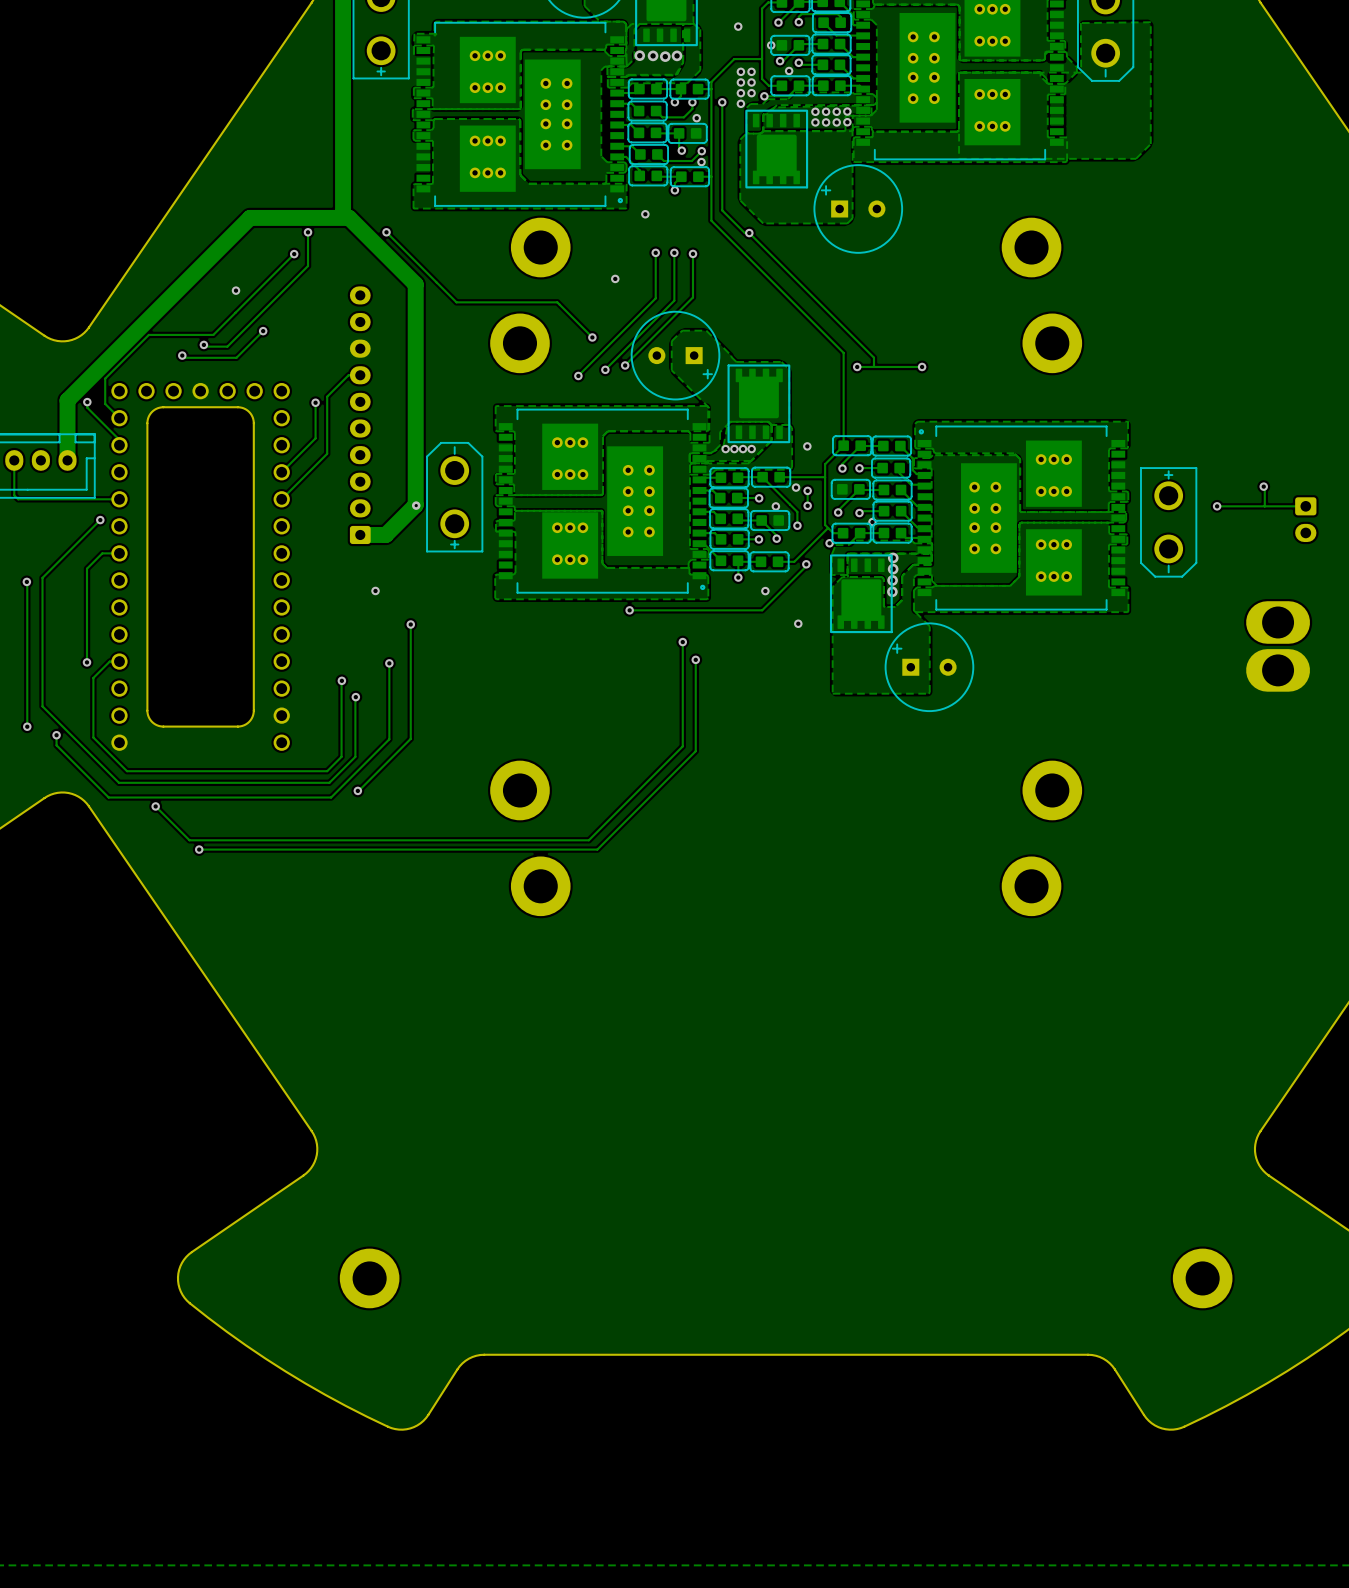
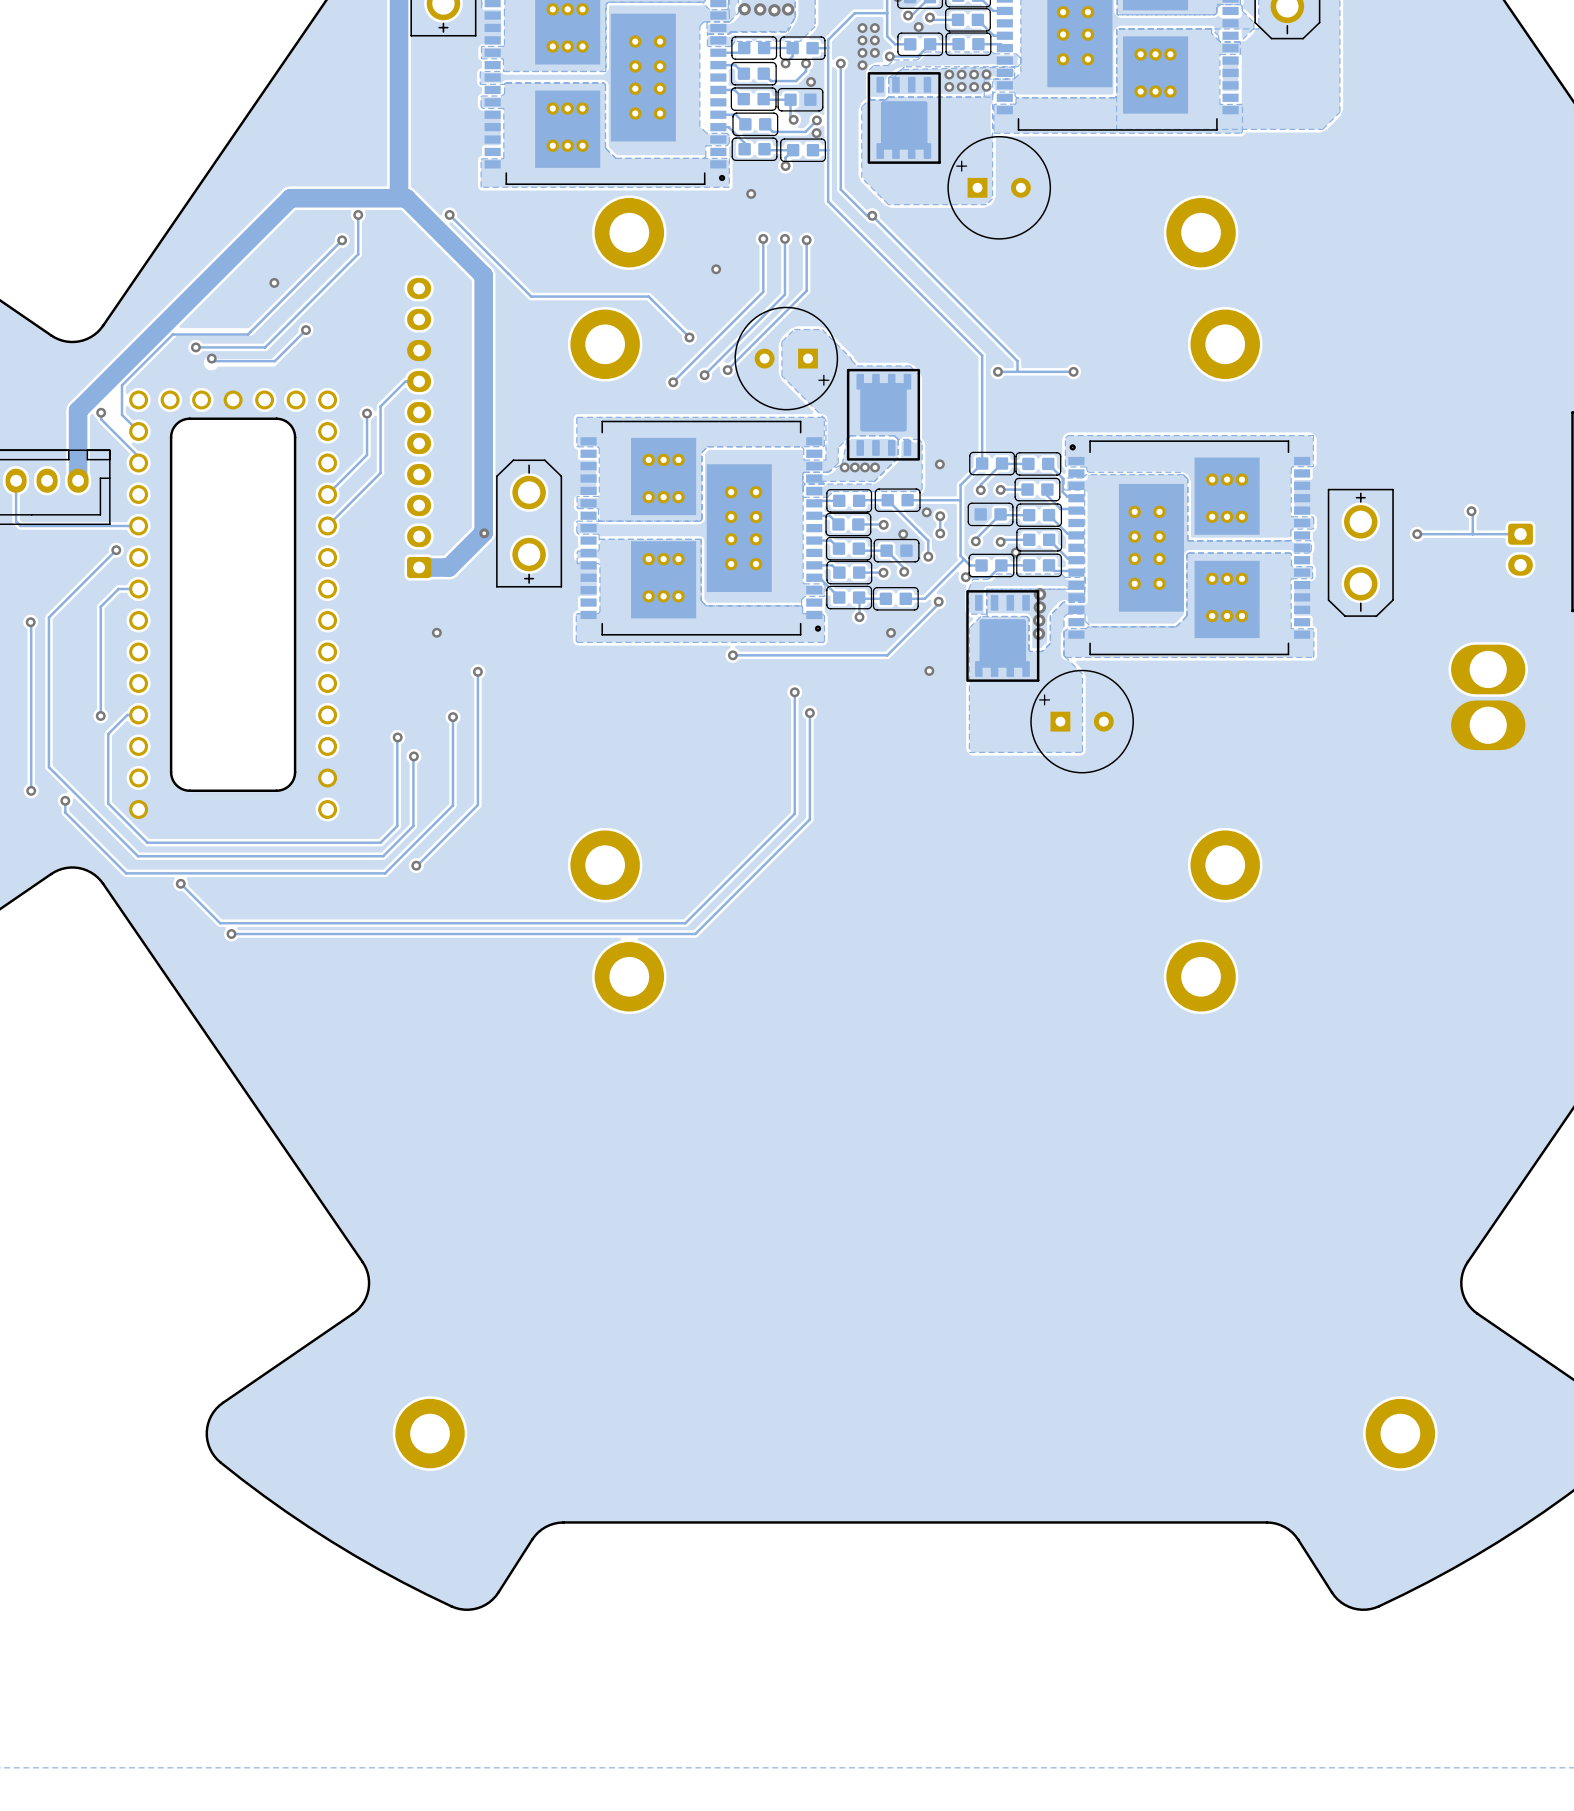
track: (203, 344) (205, 346) (228, 346) -> (195, 347) (265, 347)
via position: (203, 344) -> (195, 347)

